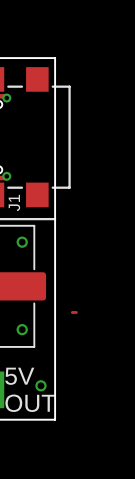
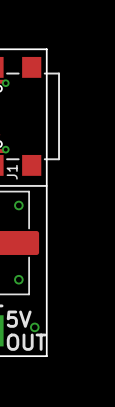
top track: (72, 312) (76, 312) -> none

